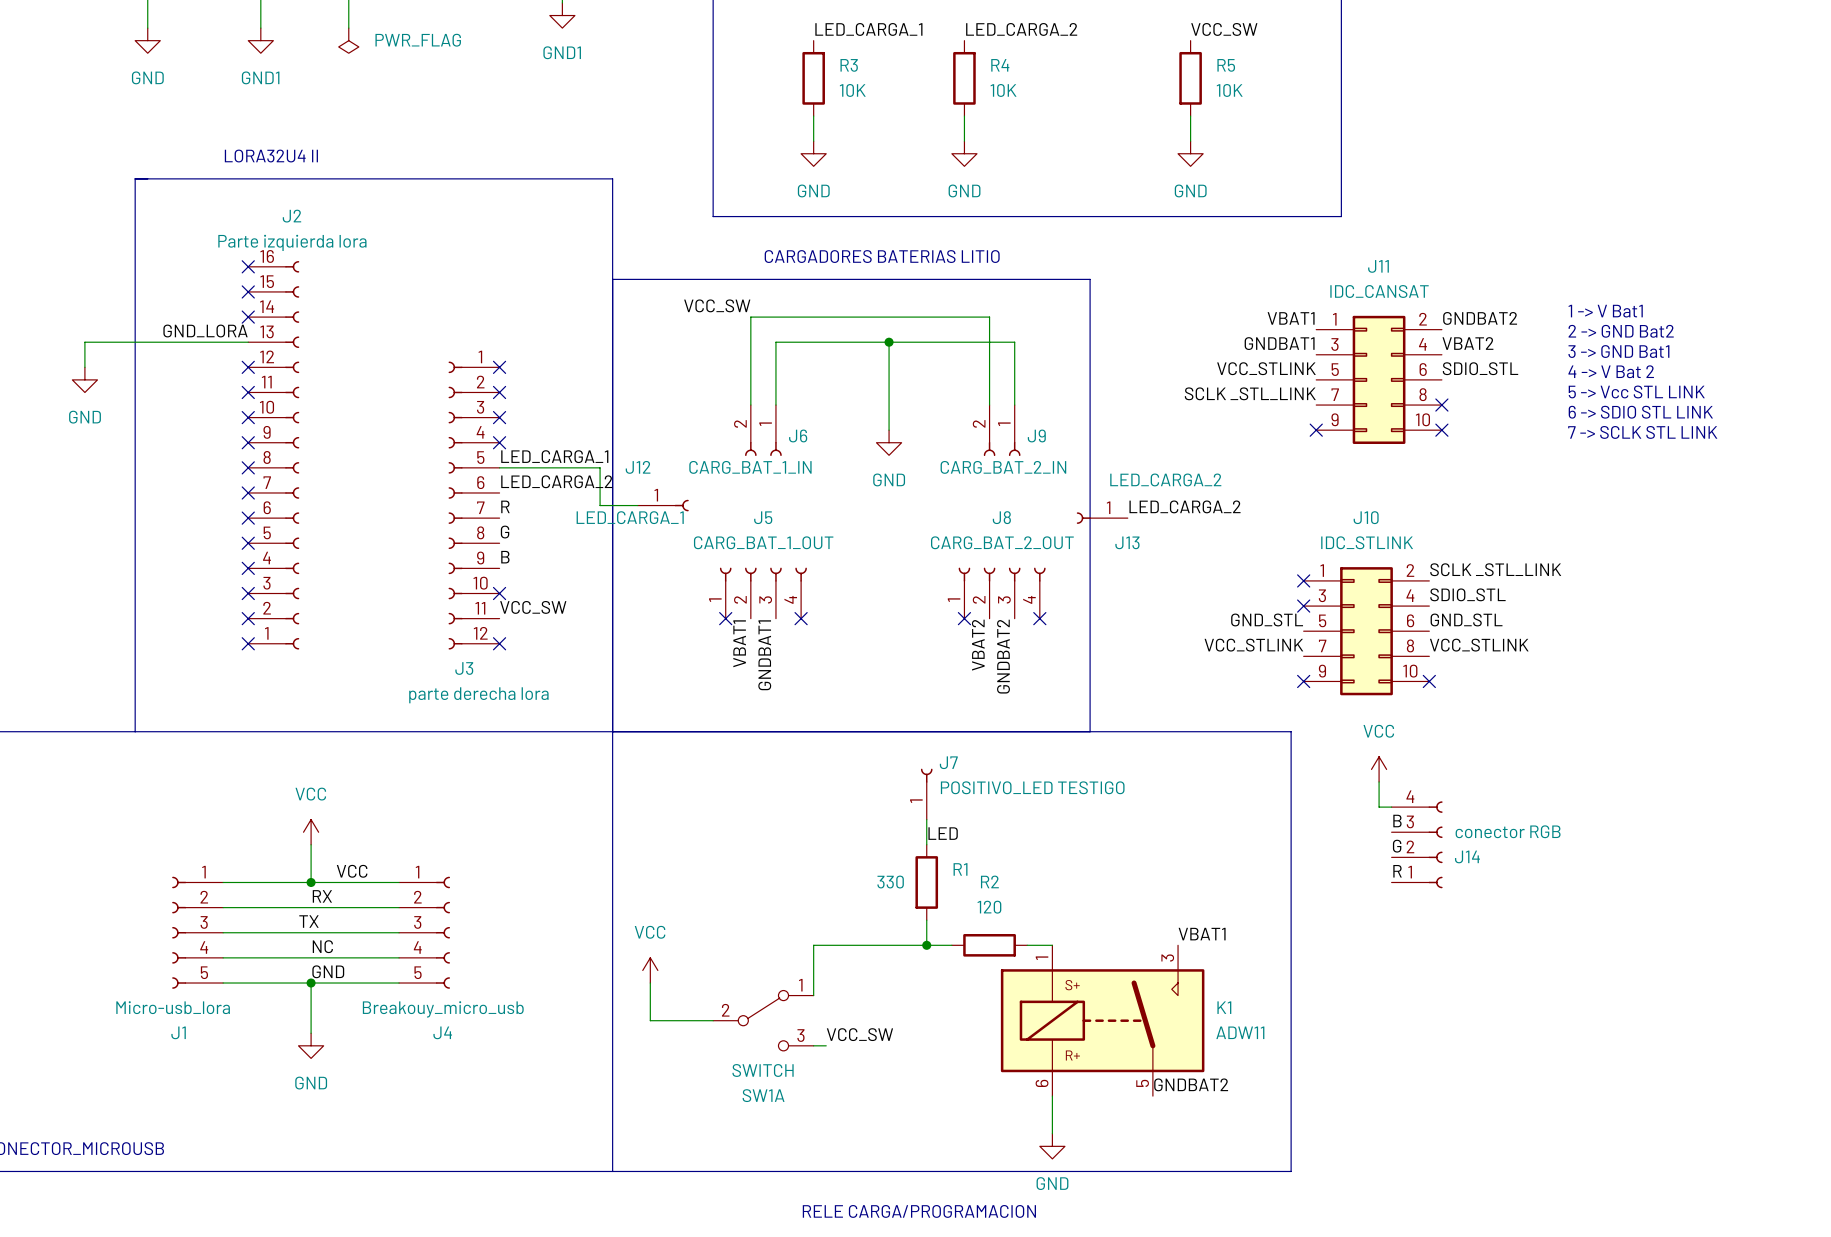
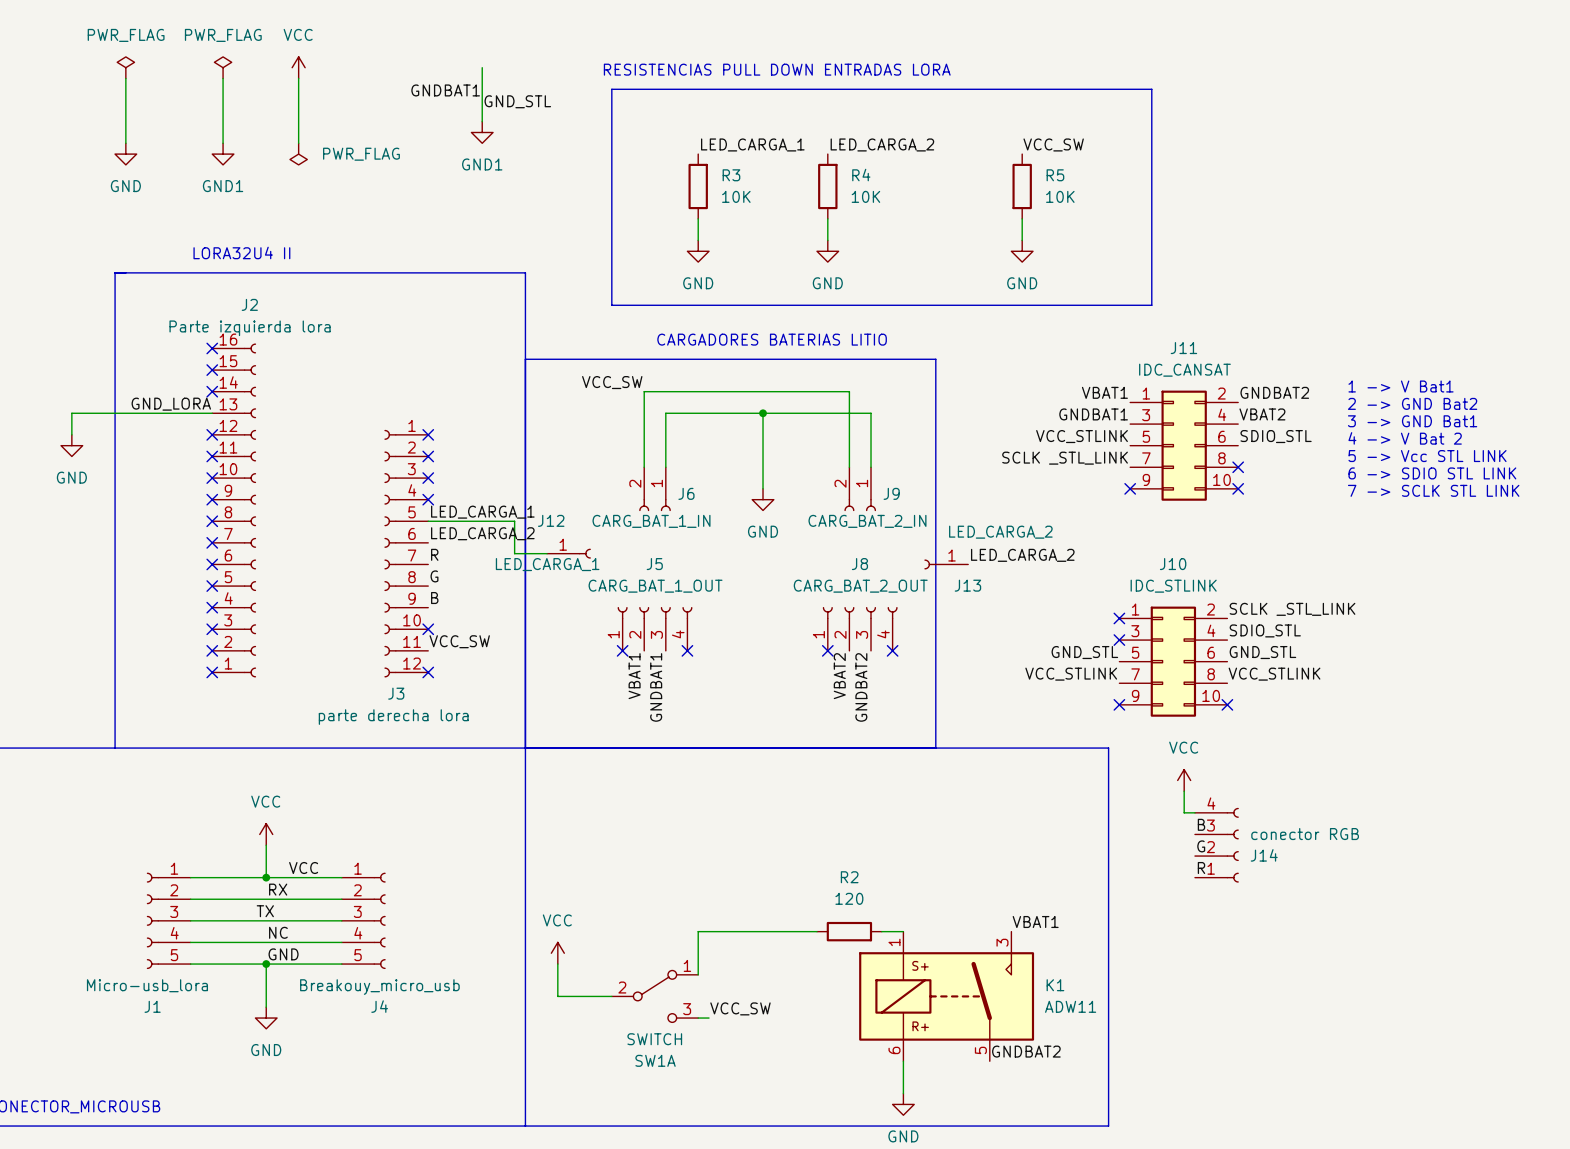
J7: POSITIVO_LED TESTIGO (926, 794) -> none
wire: (926, 819) (926, 844) -> none
label: LED (943, 833) -> none
R1: 330 (926, 882) -> none
wire: (926, 920) (926, 945) -> none
junction: (926, 945) -> none

